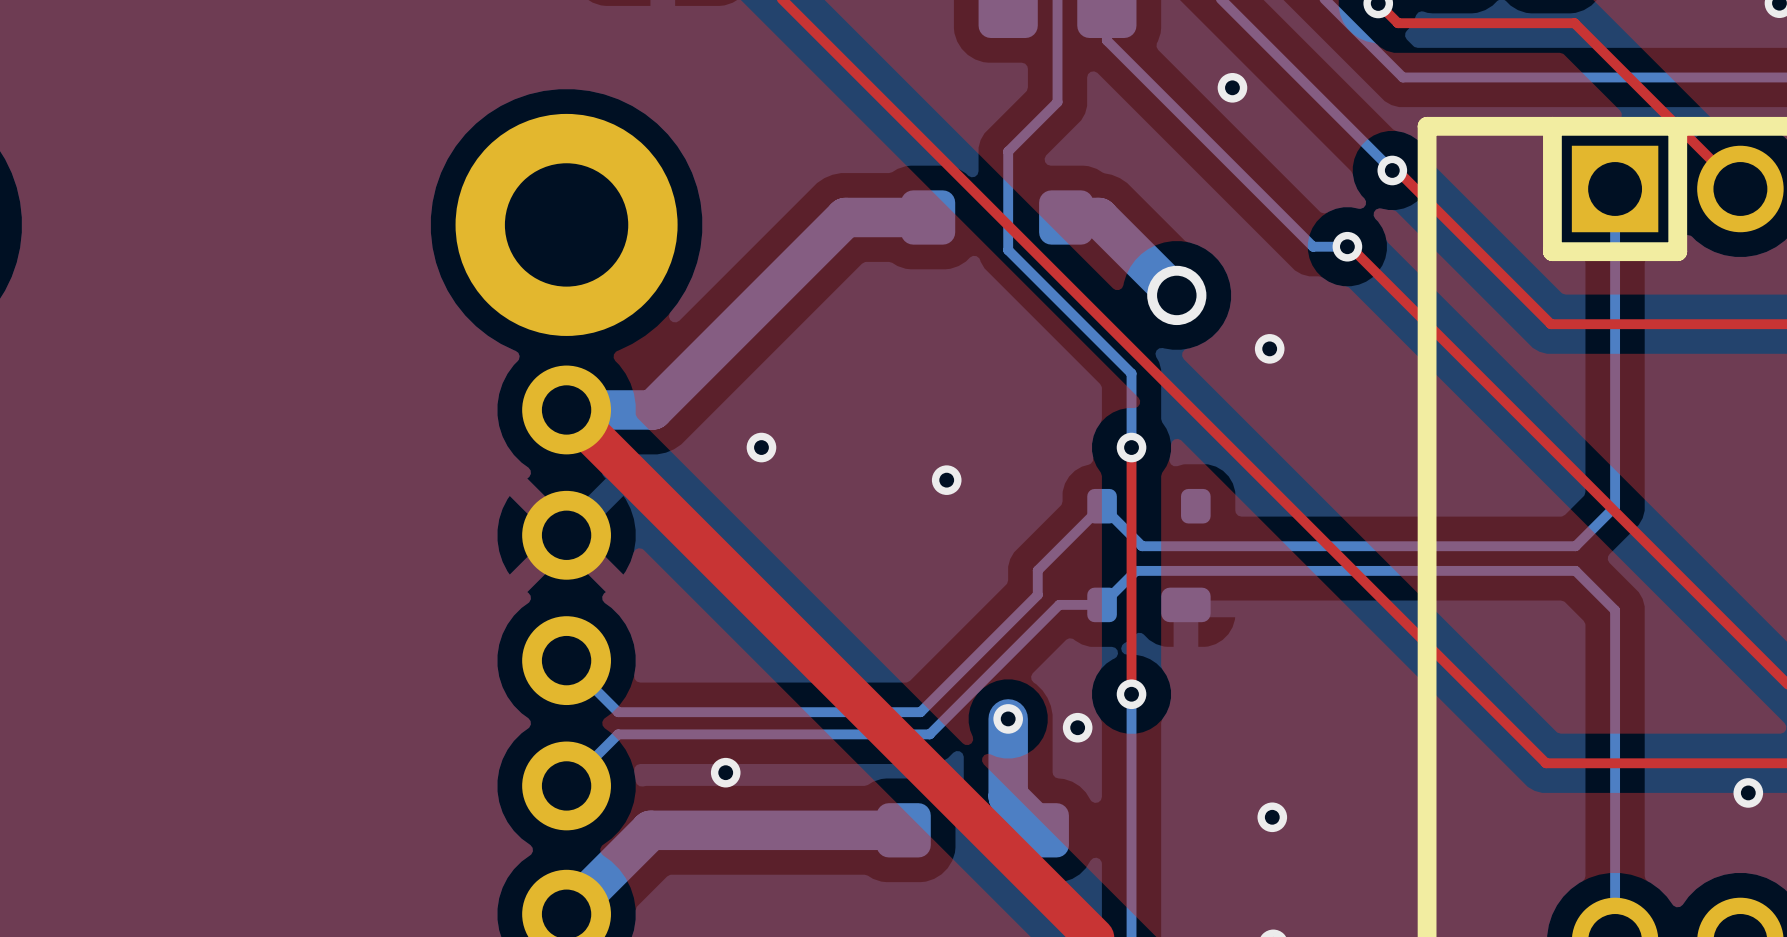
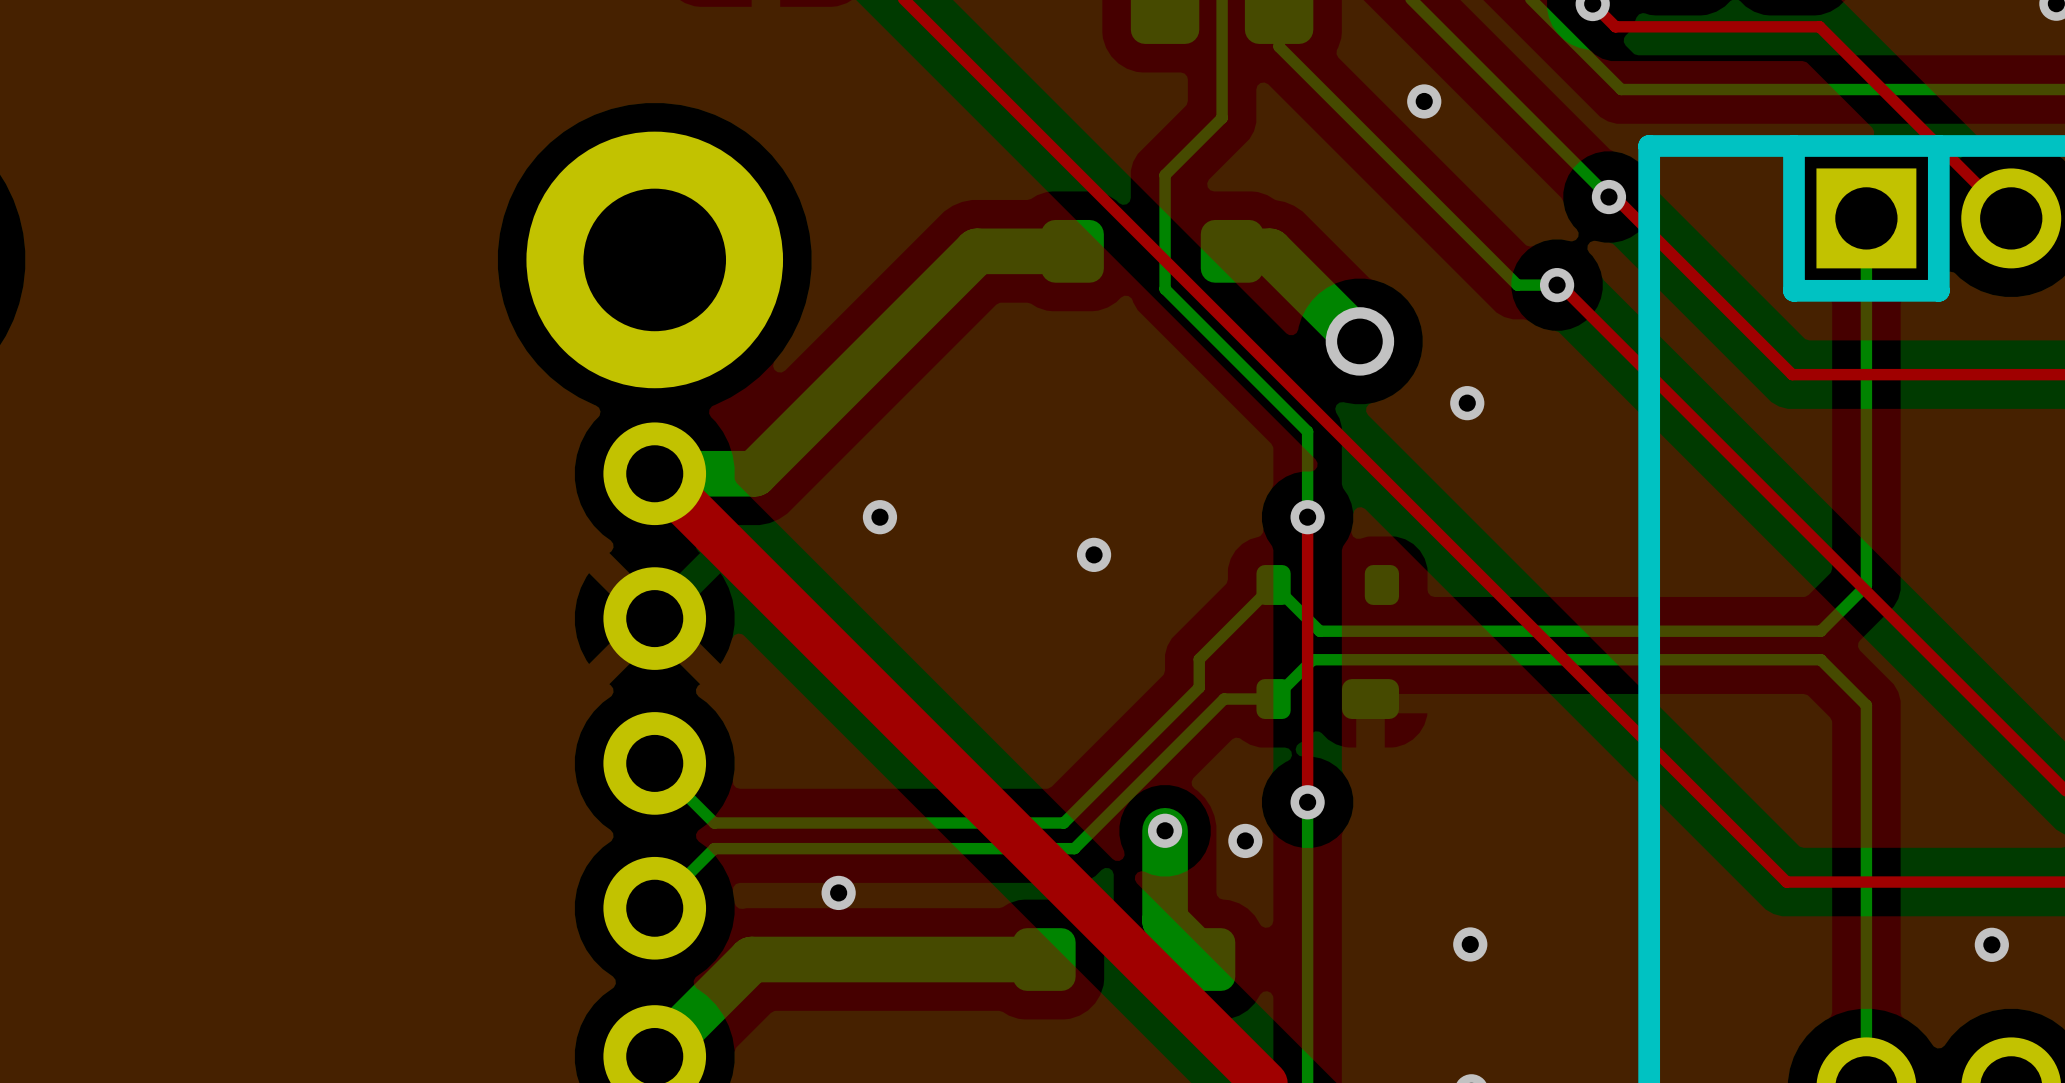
via position: (1748, 792) -> (1991, 944)

